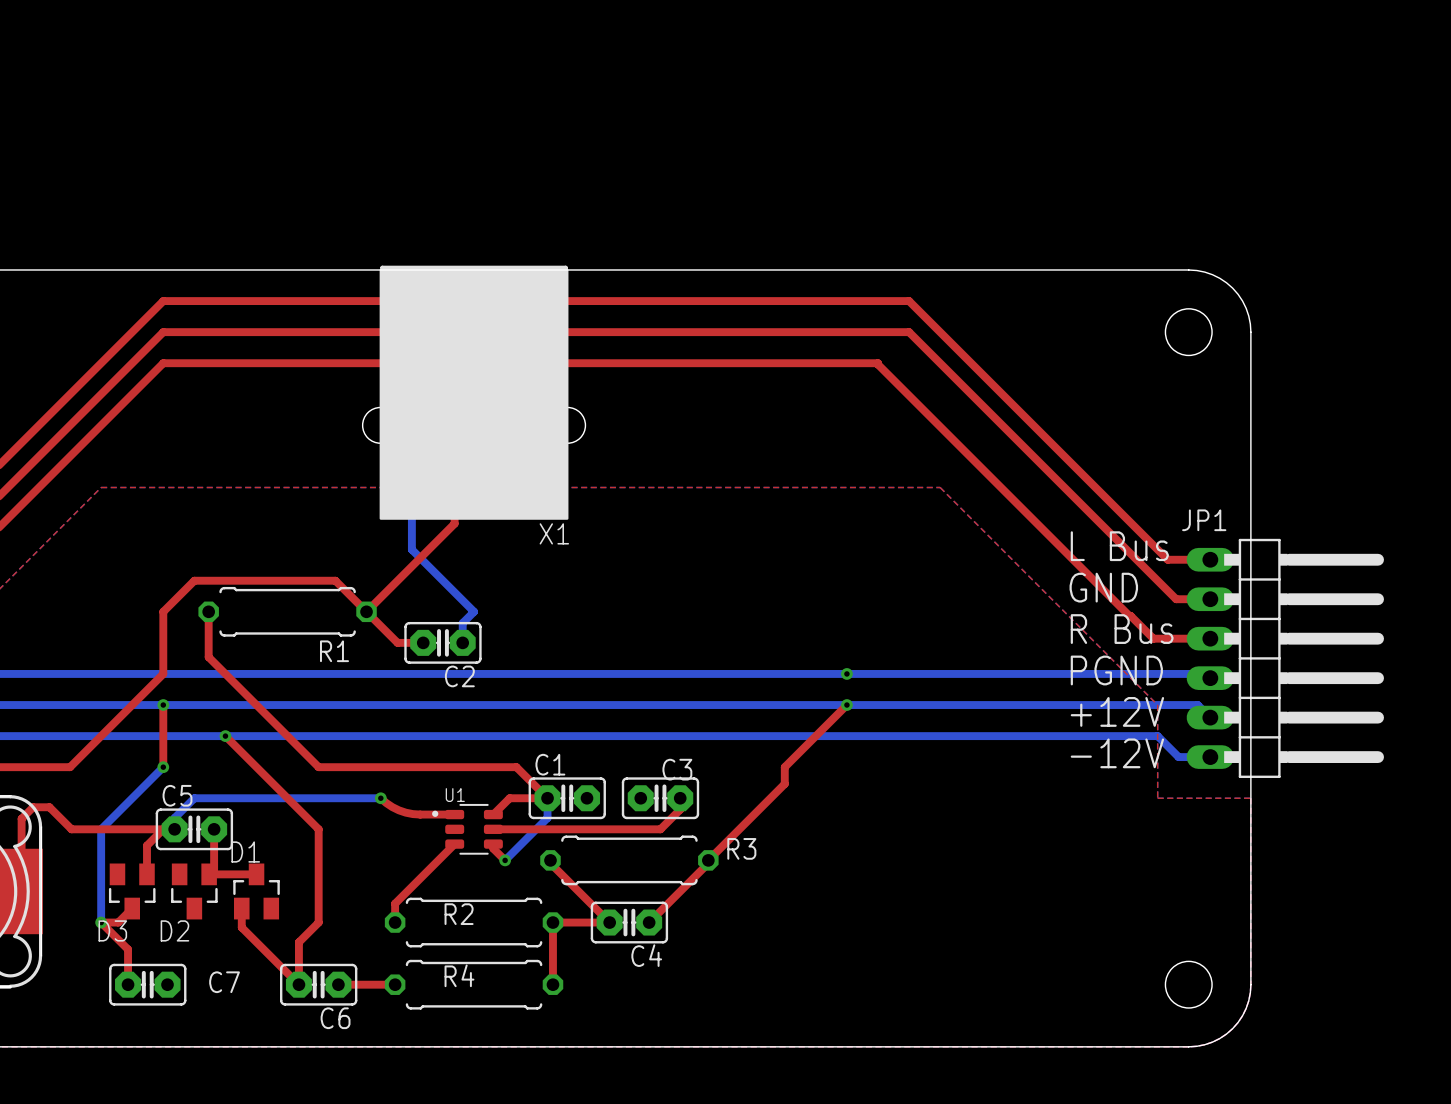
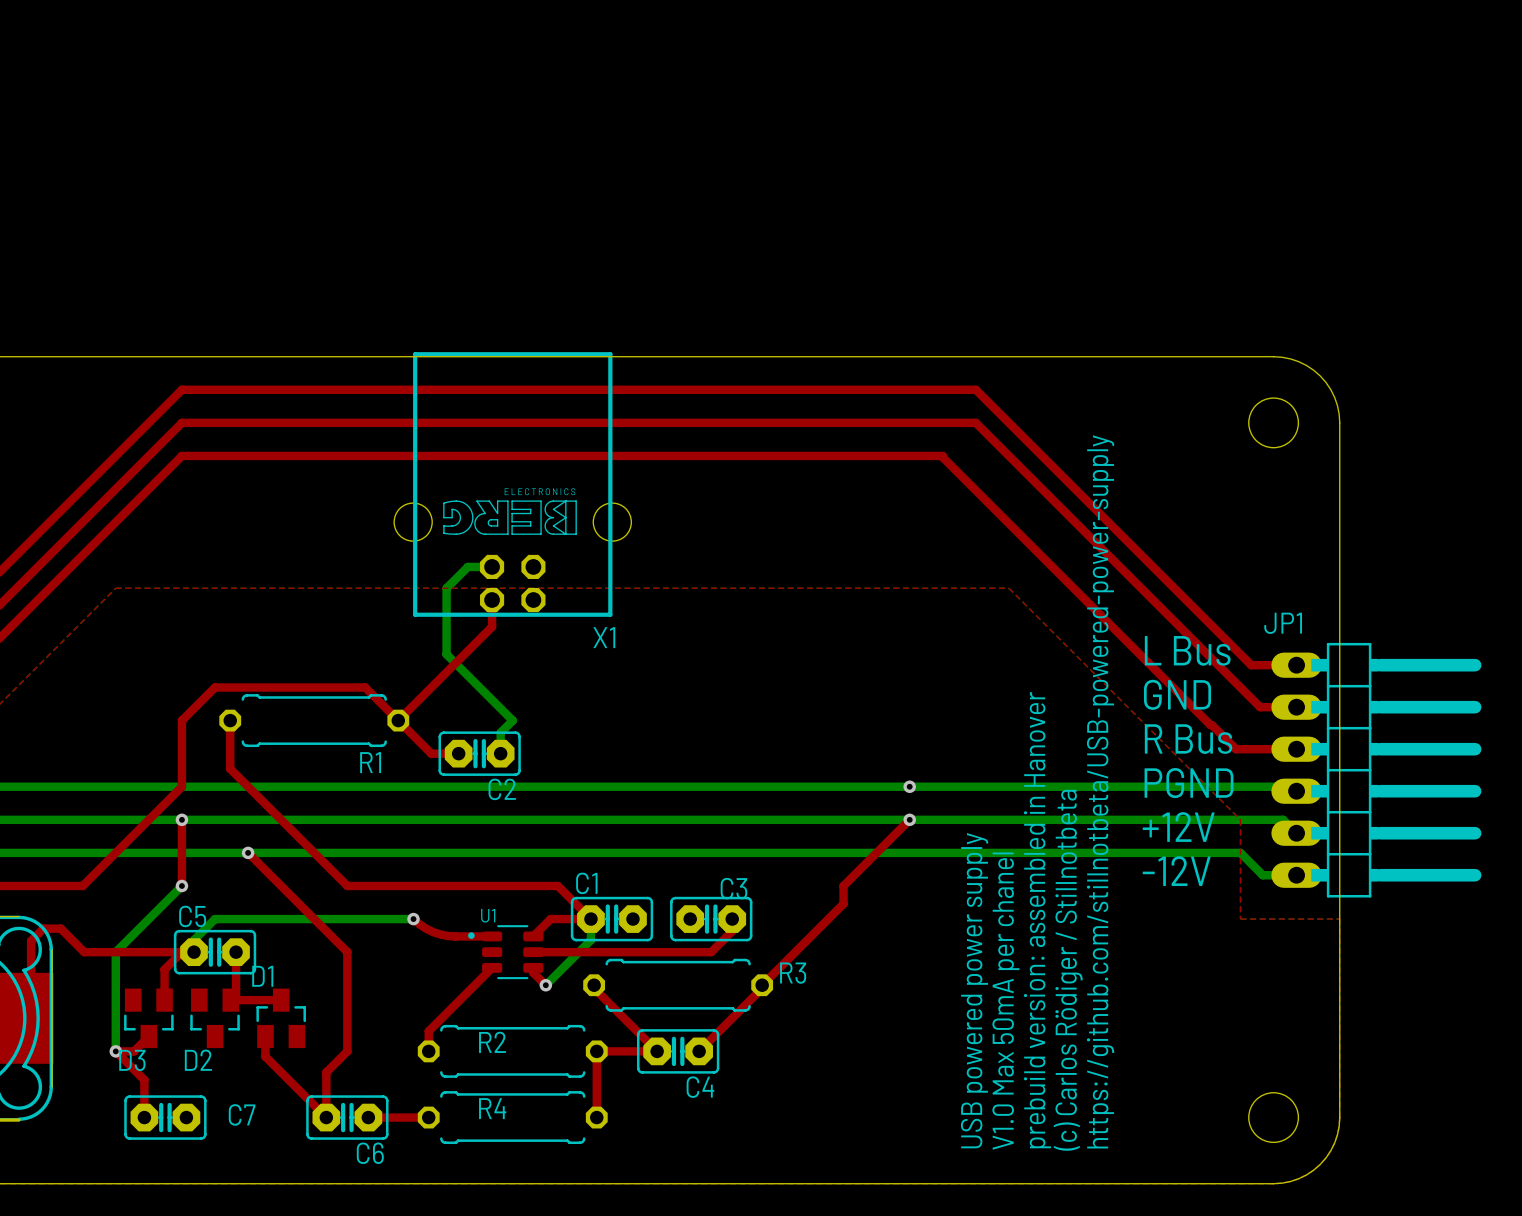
drawing: [379, 268, 569, 520] -> none
text: none -> https://github.com/stillnotbeta/USB-powered-power-supply (1100, 791)
text: none -> prebuild version: assembled in Hanover (1037, 920)
text: none -> (c) Carlos Rödiger / Stillnotbeta (1068, 970)
text: none -> USB powered power supply (974, 990)
text: none -> V1.0 Max 50mA per chanel (1005, 1001)

